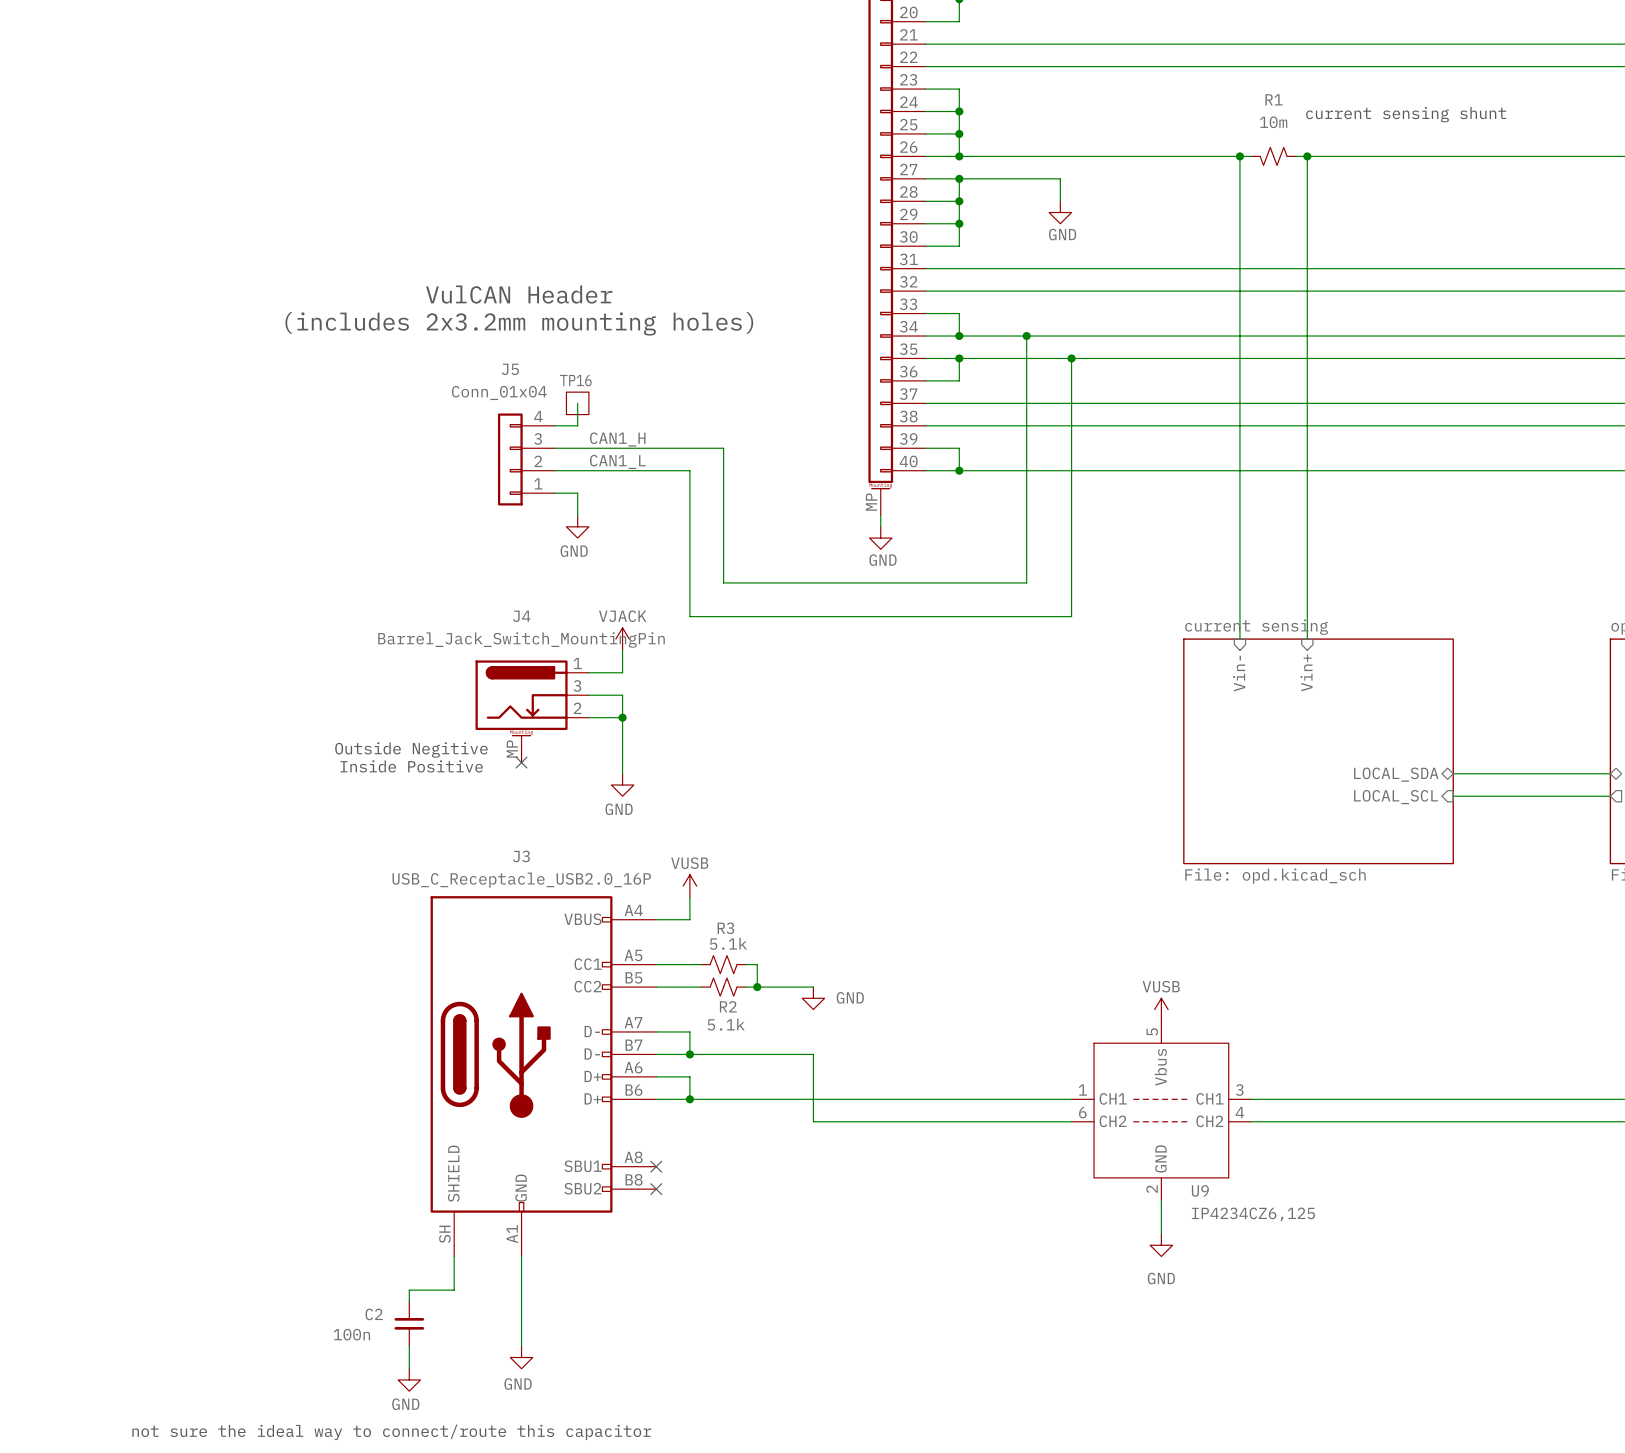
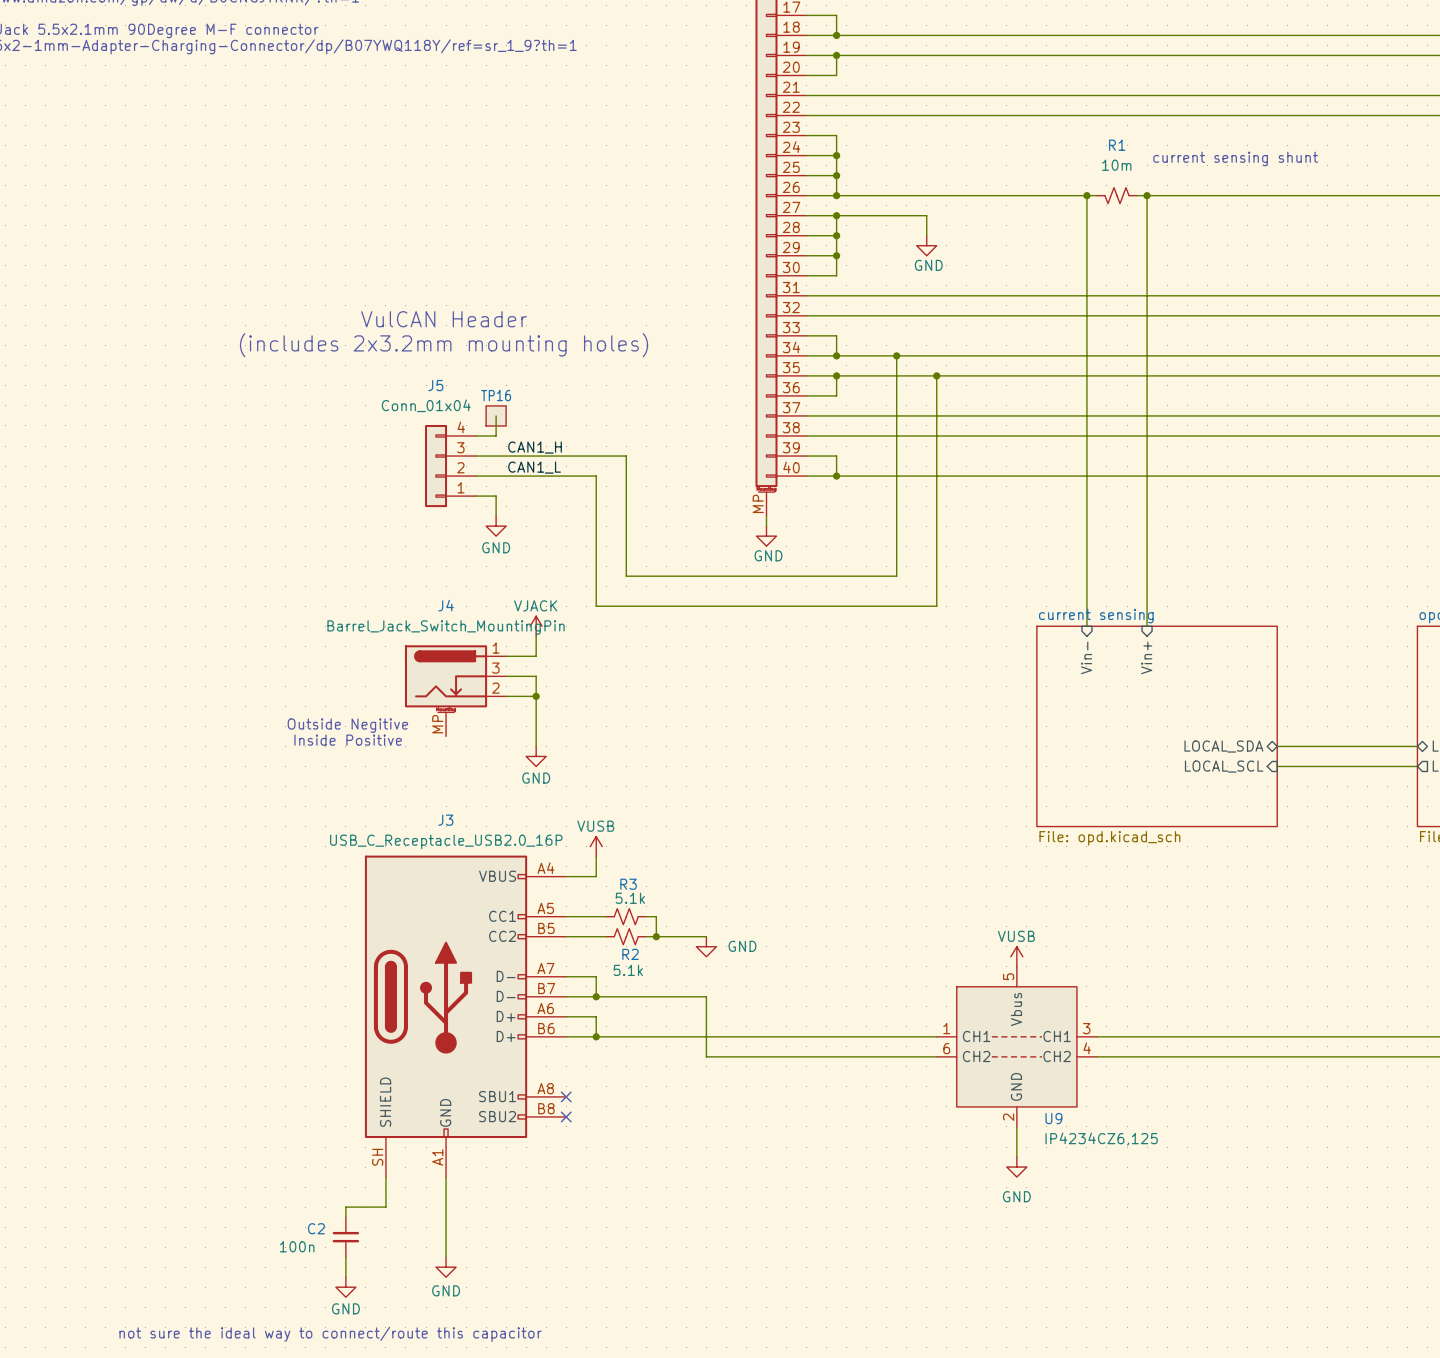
no-connect mark: (521, 762) -> none

